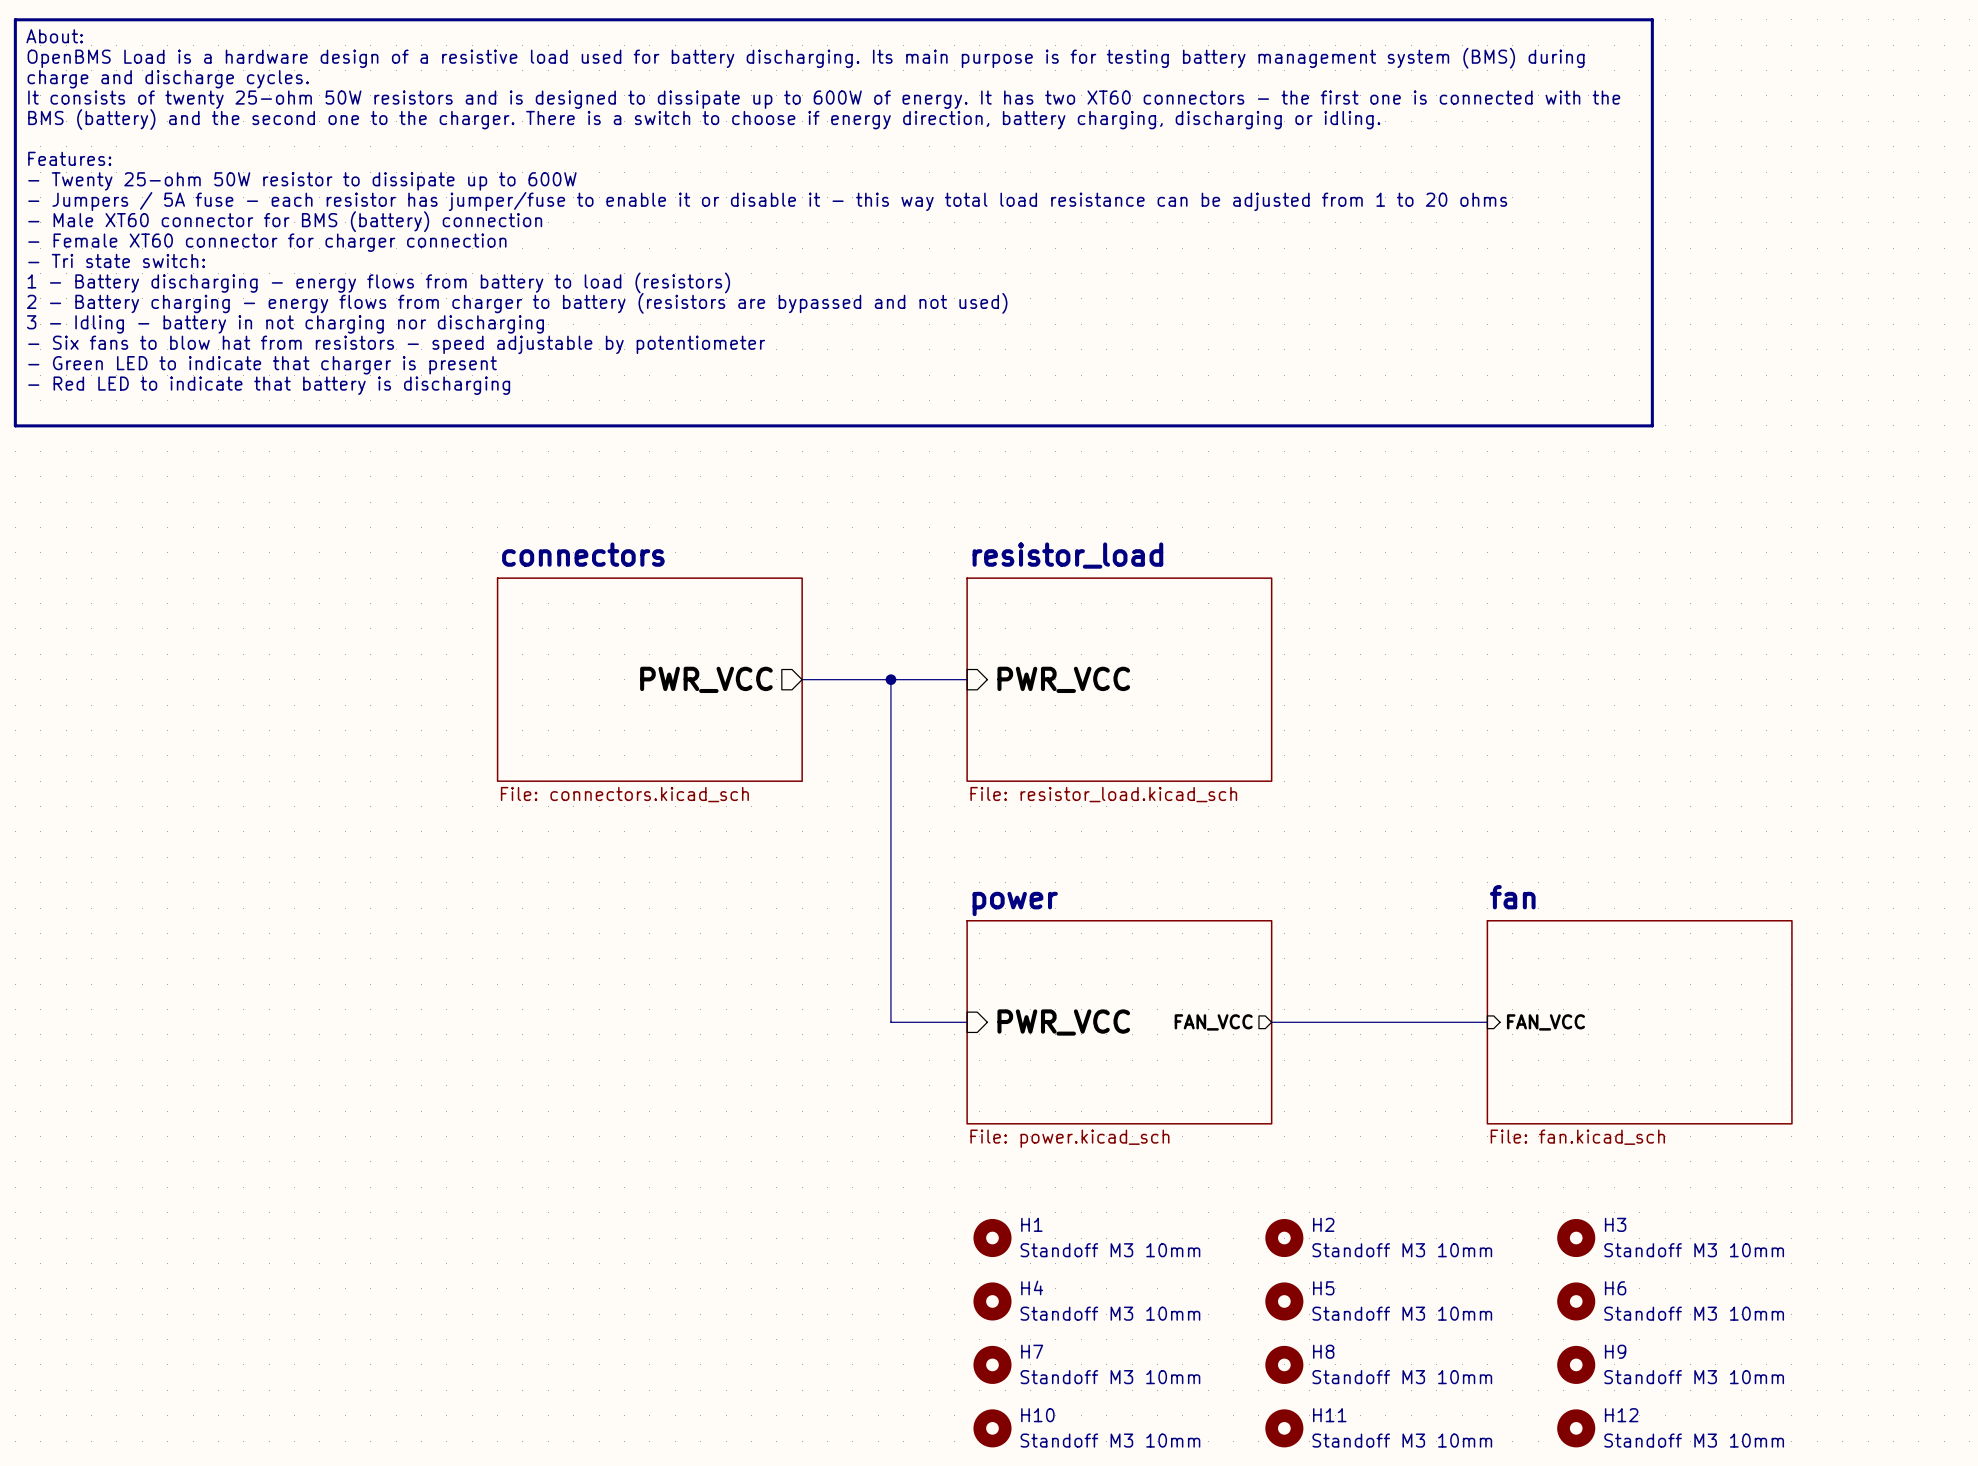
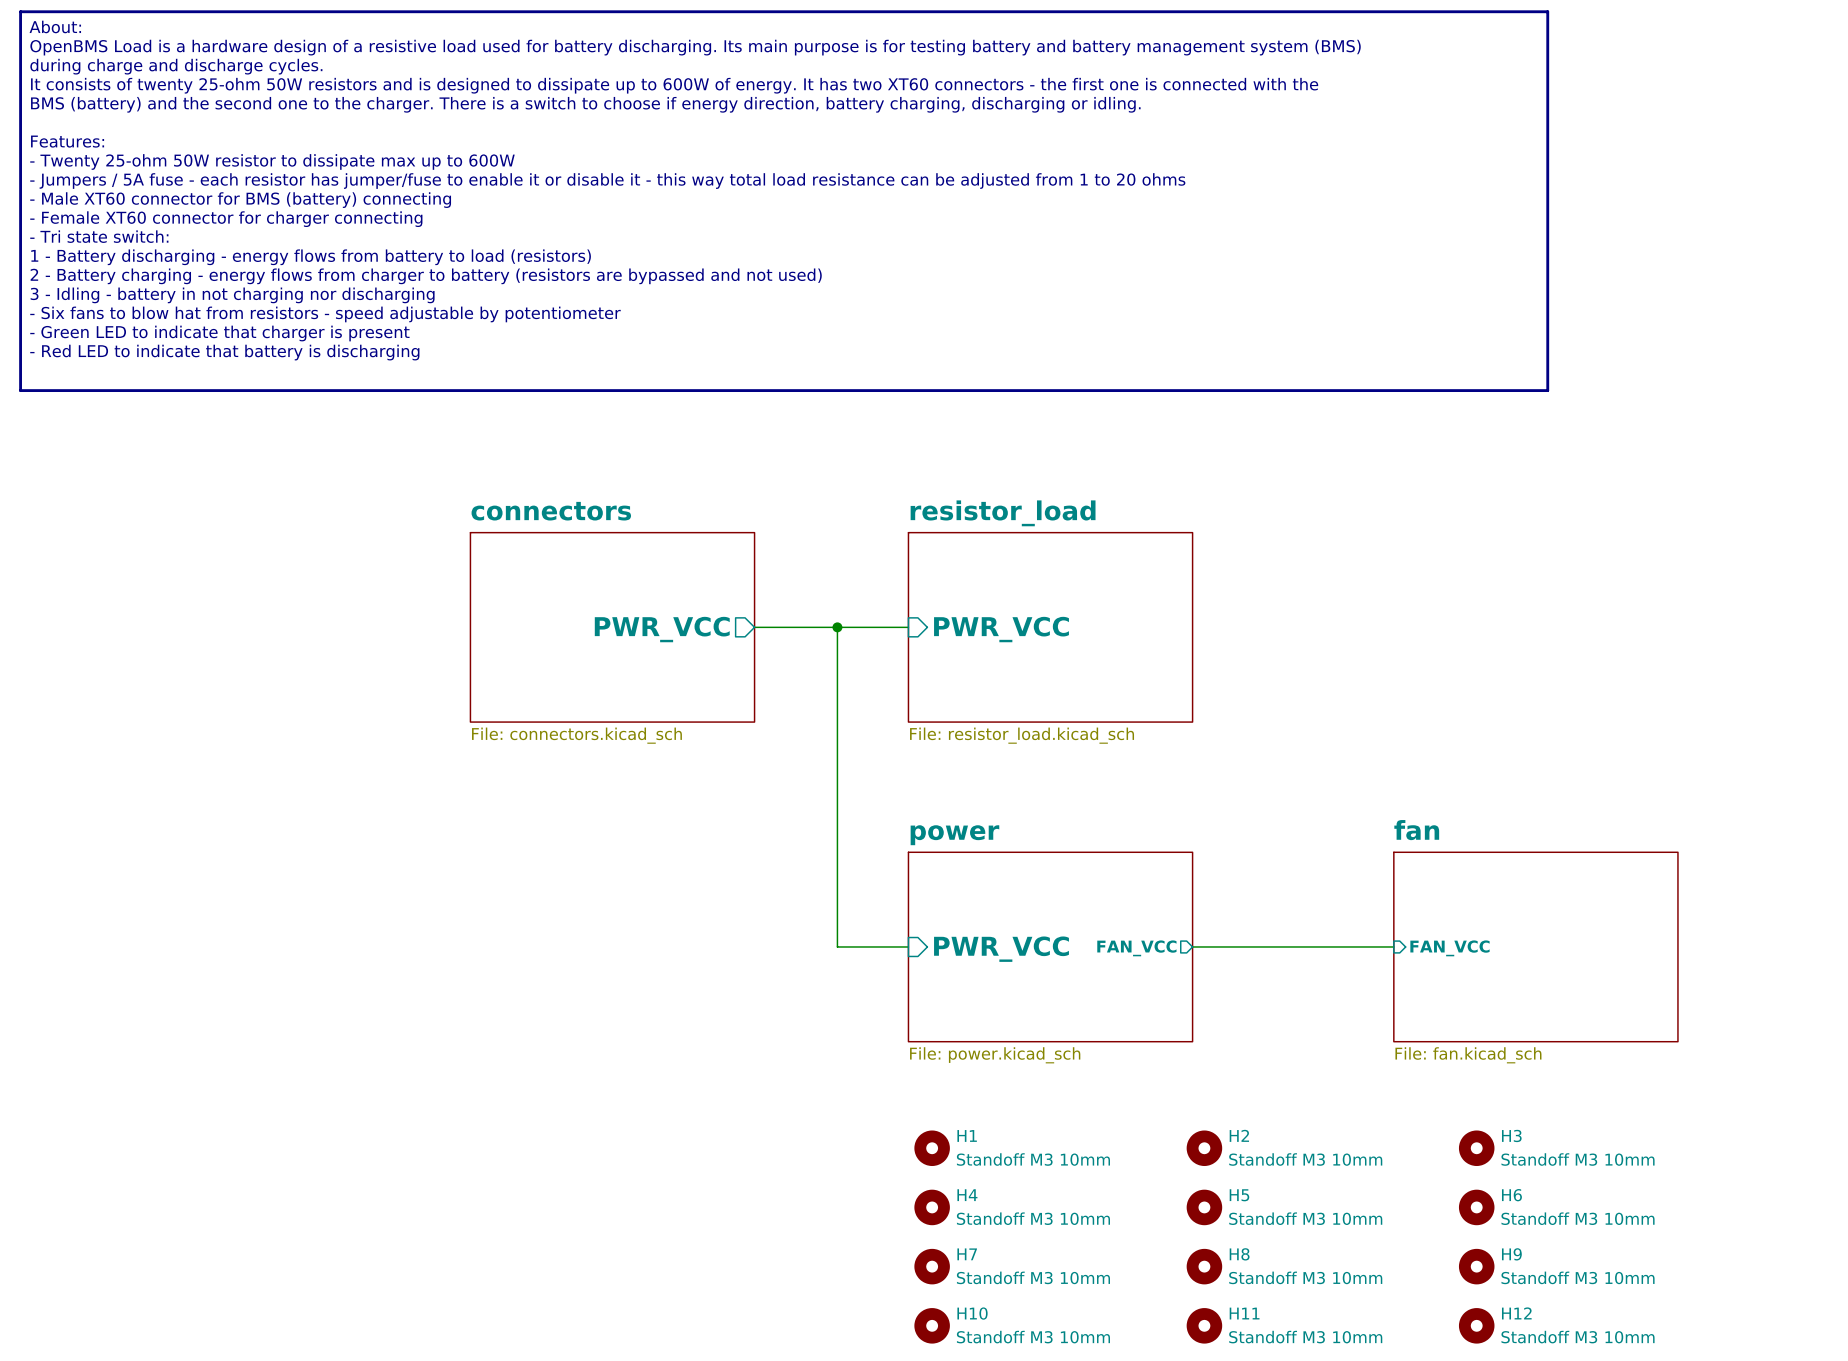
text: OpenBMS Load is a hardware design of a resistive load used for battery discharging. Its main purpose is for testing battery management system (BMS) during (806, 58) -> OpenBMS Load is a hardware design of a resistive load used for battery discharging. Its main purpose is for testing battery and battery management system (BMS) (695, 47)
text: charge and discharge cycles. (168, 79) -> during charge and discharge cycles. (176, 66)
text: - Twenty 25-ohm 50W resistor to dissipate up to 600W (302, 181) -> - Twenty 25-ohm 50W resistor to dissipate max up to 600W (272, 161)
text: - Male XT60 connector for BMS (battery) connection (285, 221) -> - Male XT60 connector for BMS (battery) connecting (240, 200)
text: - Female XT60 connector for charger connection (267, 242) -> - Female XT60 connector for charger connecting (226, 219)

